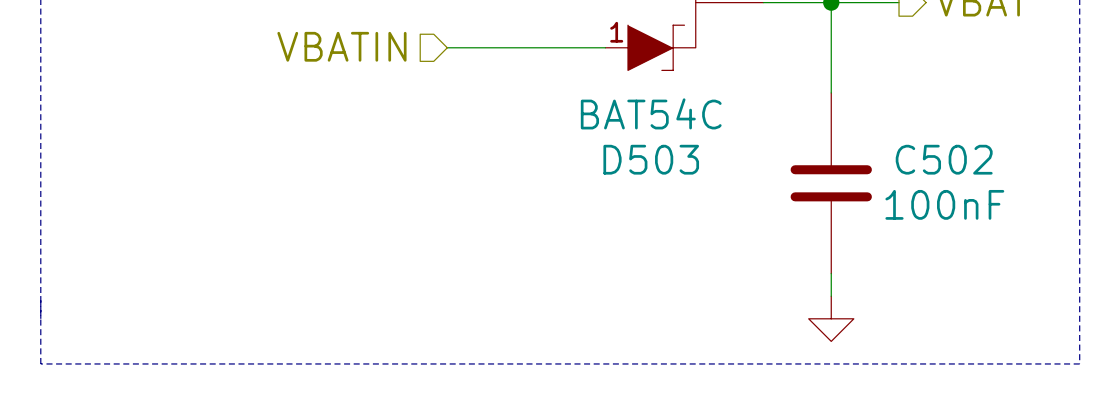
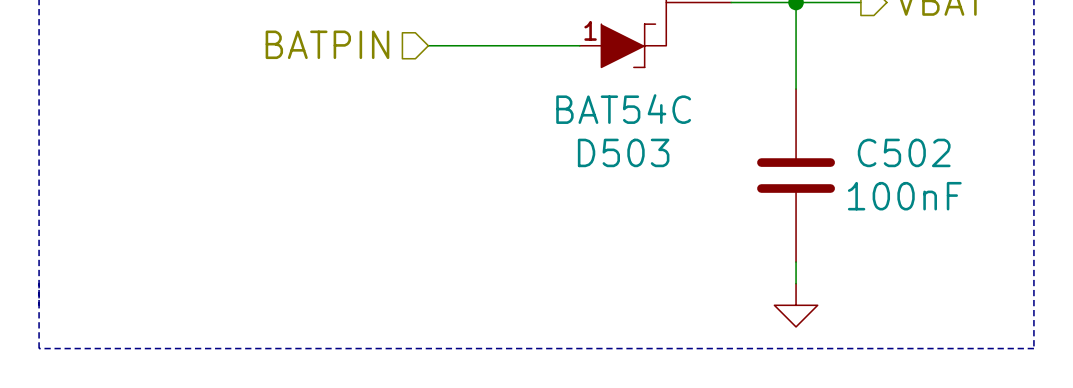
hierarchical label: VBATIN (341, 46) -> BATPIN (327, 44)

